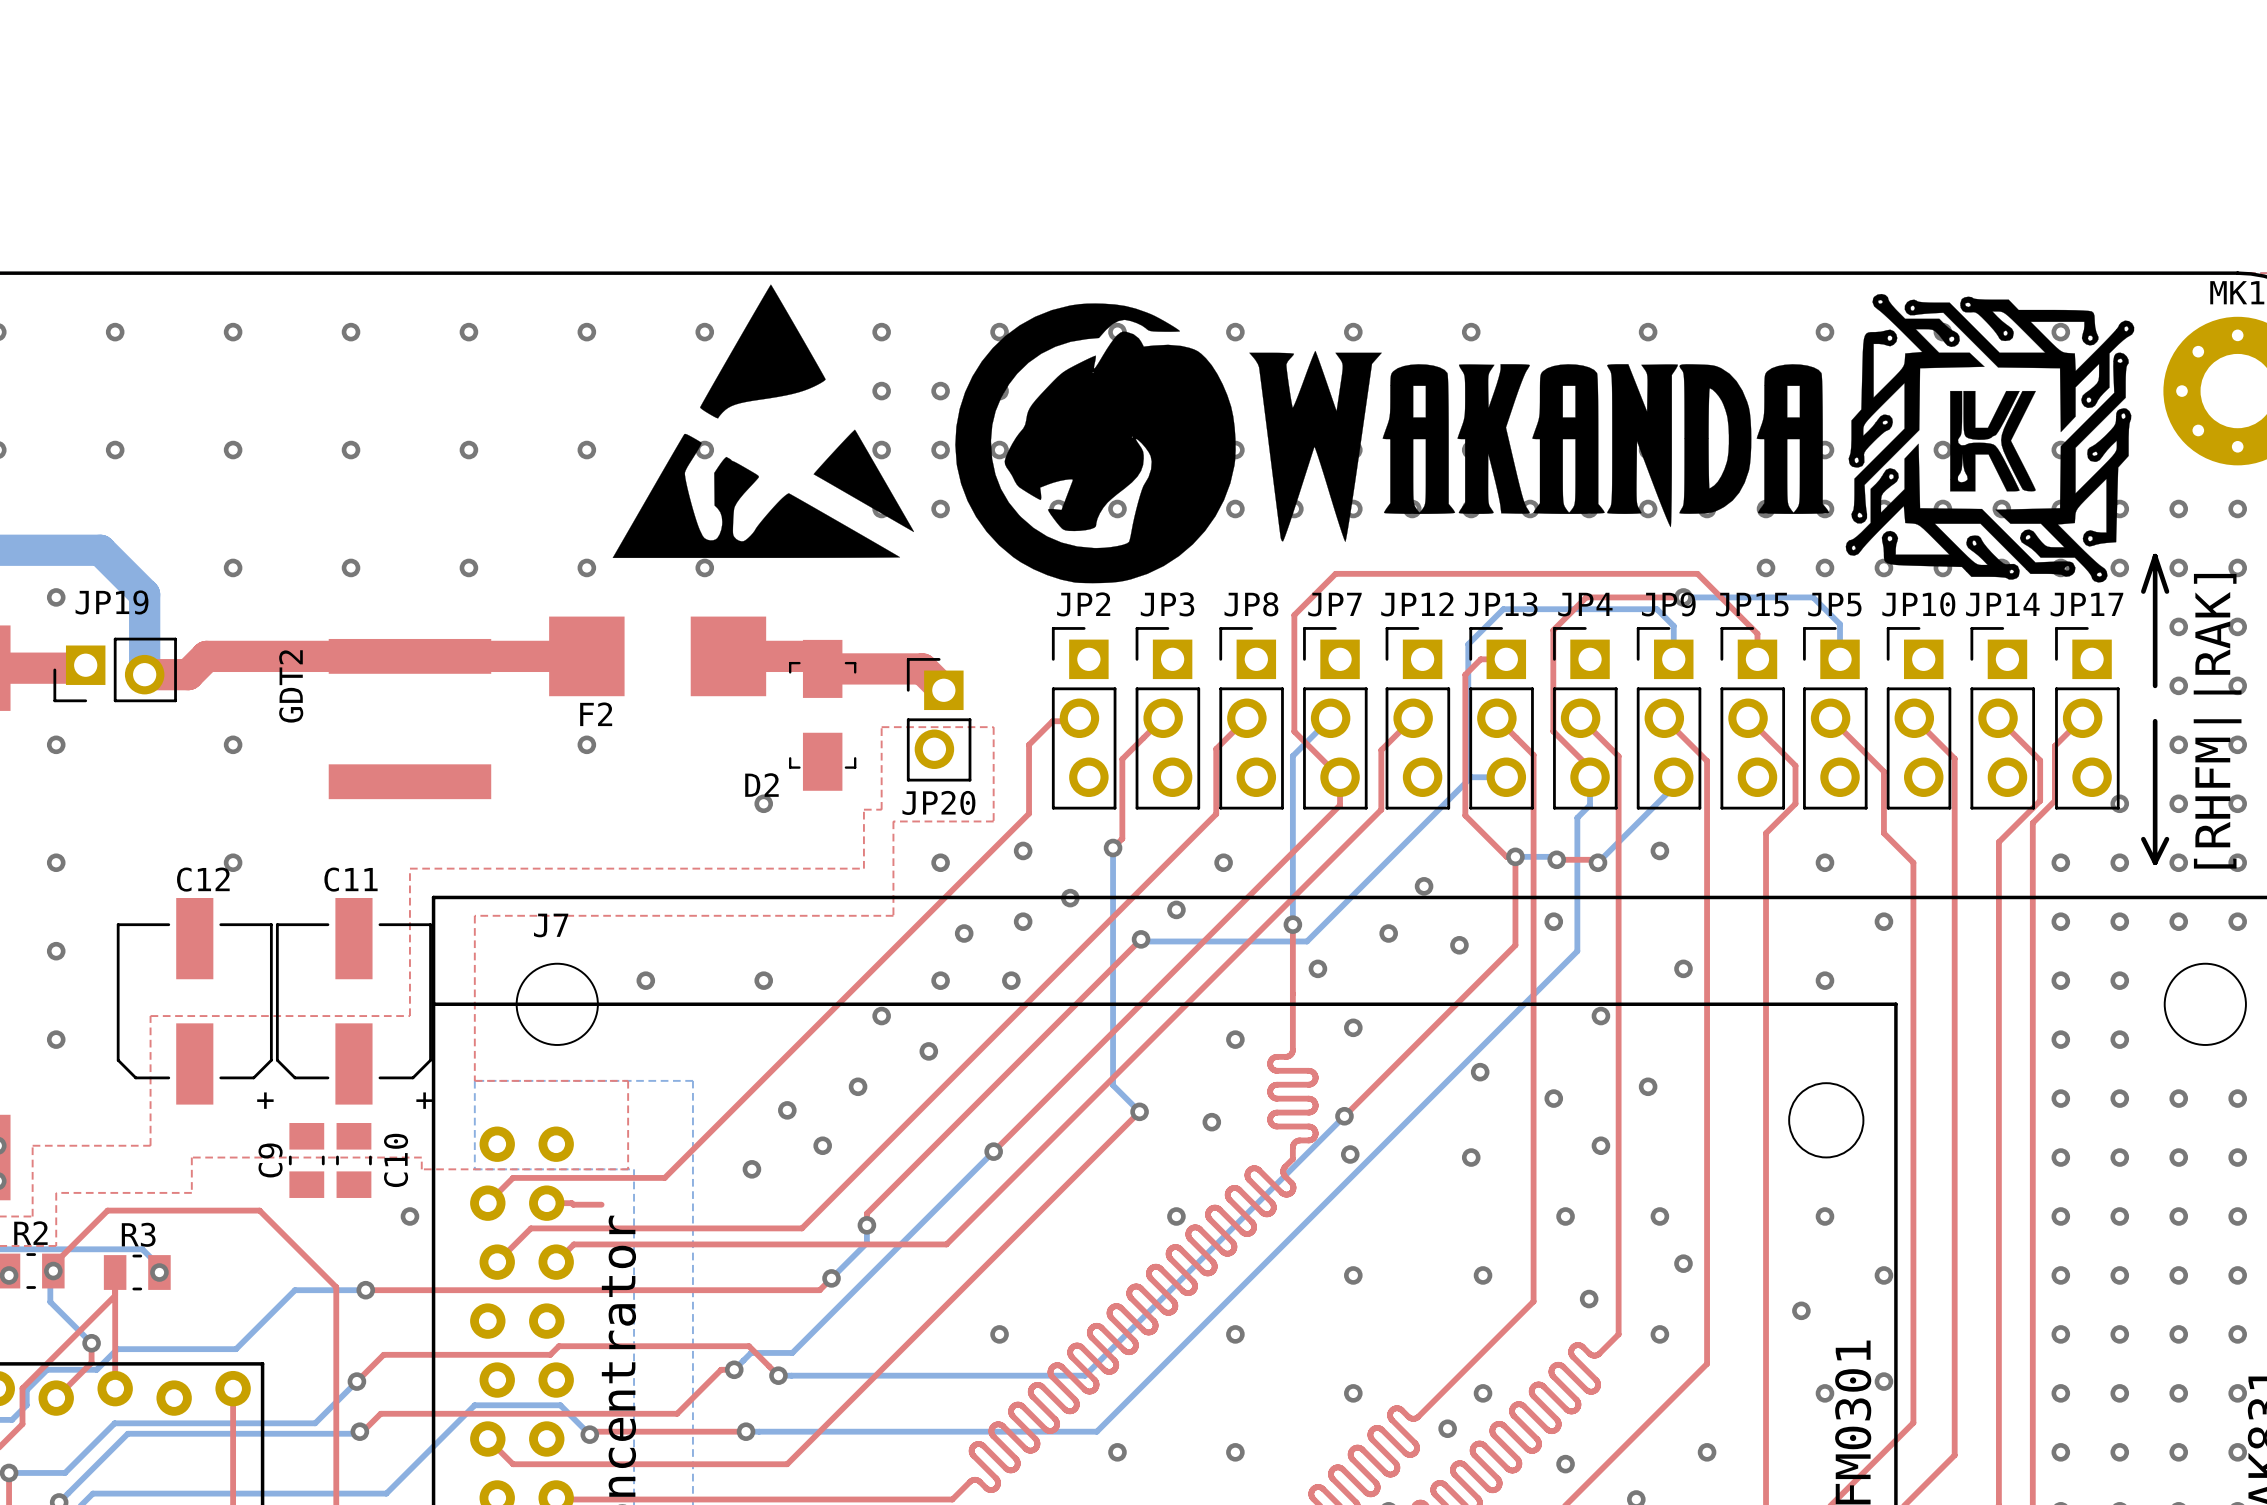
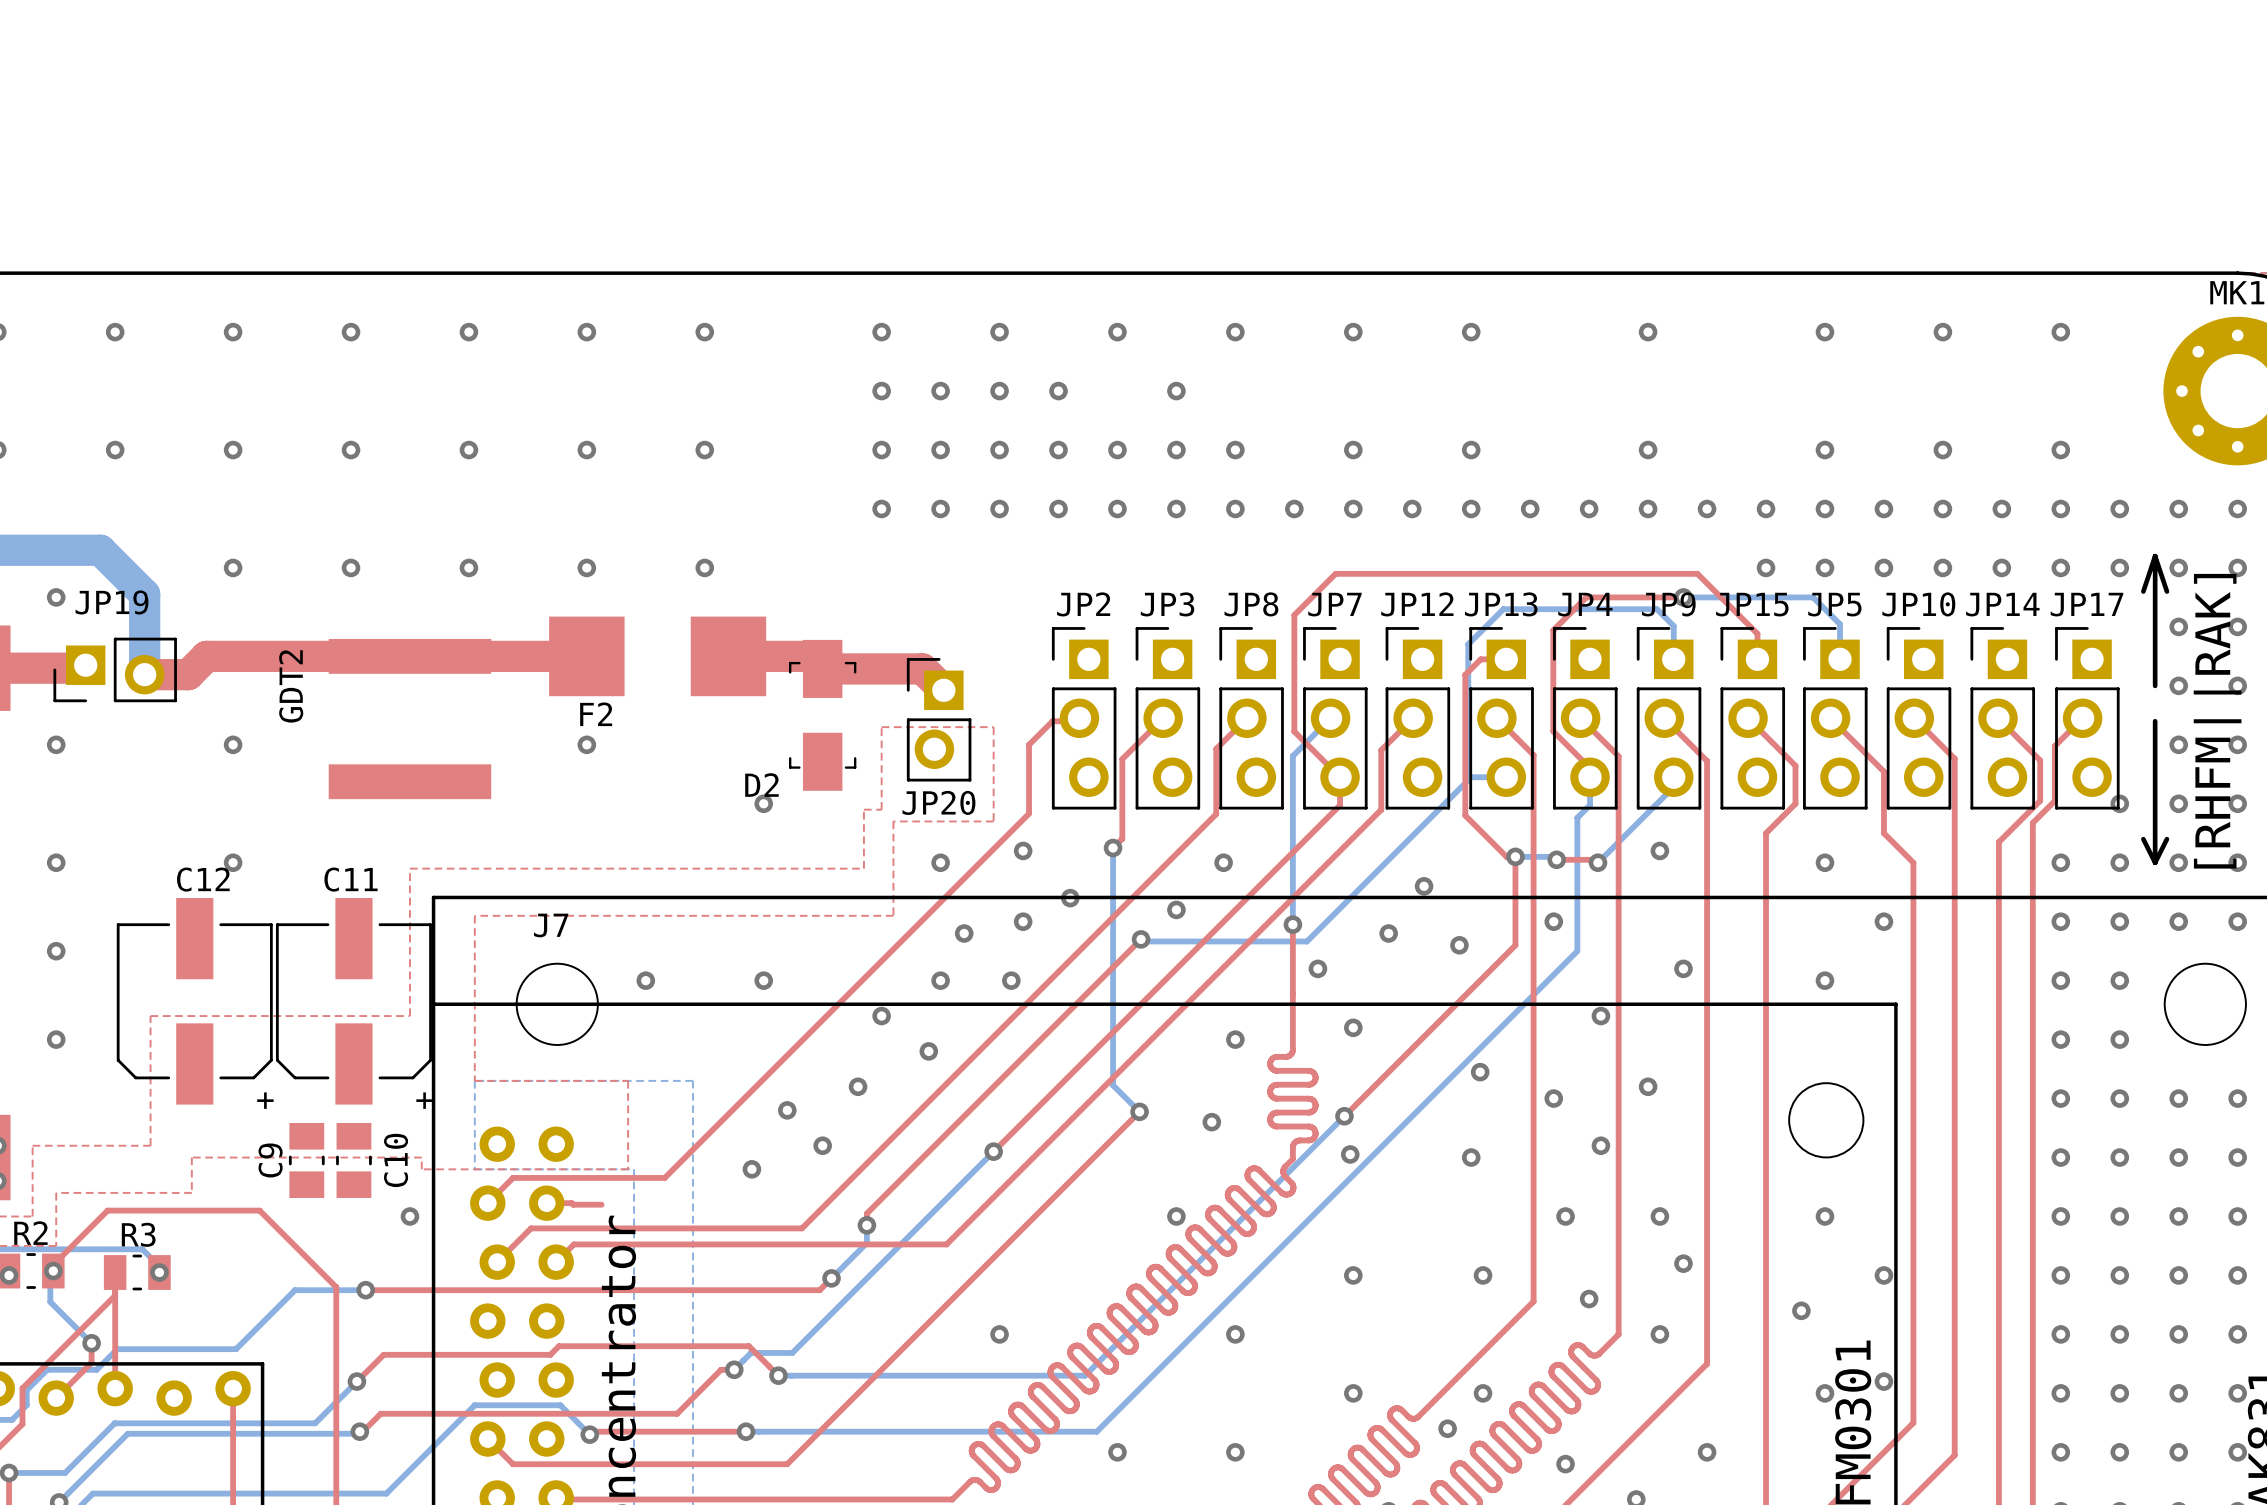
drawing: [612, 284, 915, 559] -> none
drawing: [955, 293, 2135, 584] -> none

